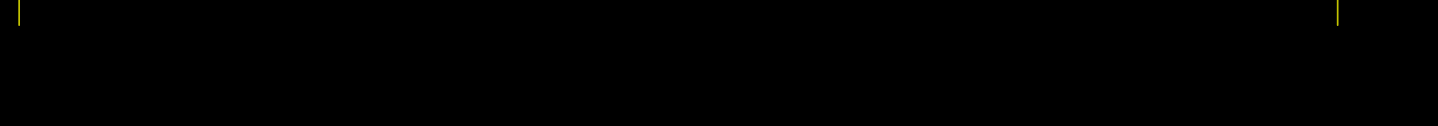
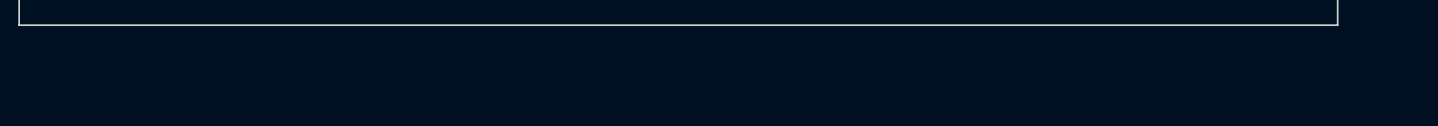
board edge: none -> (19, 25) (1337, 25)

